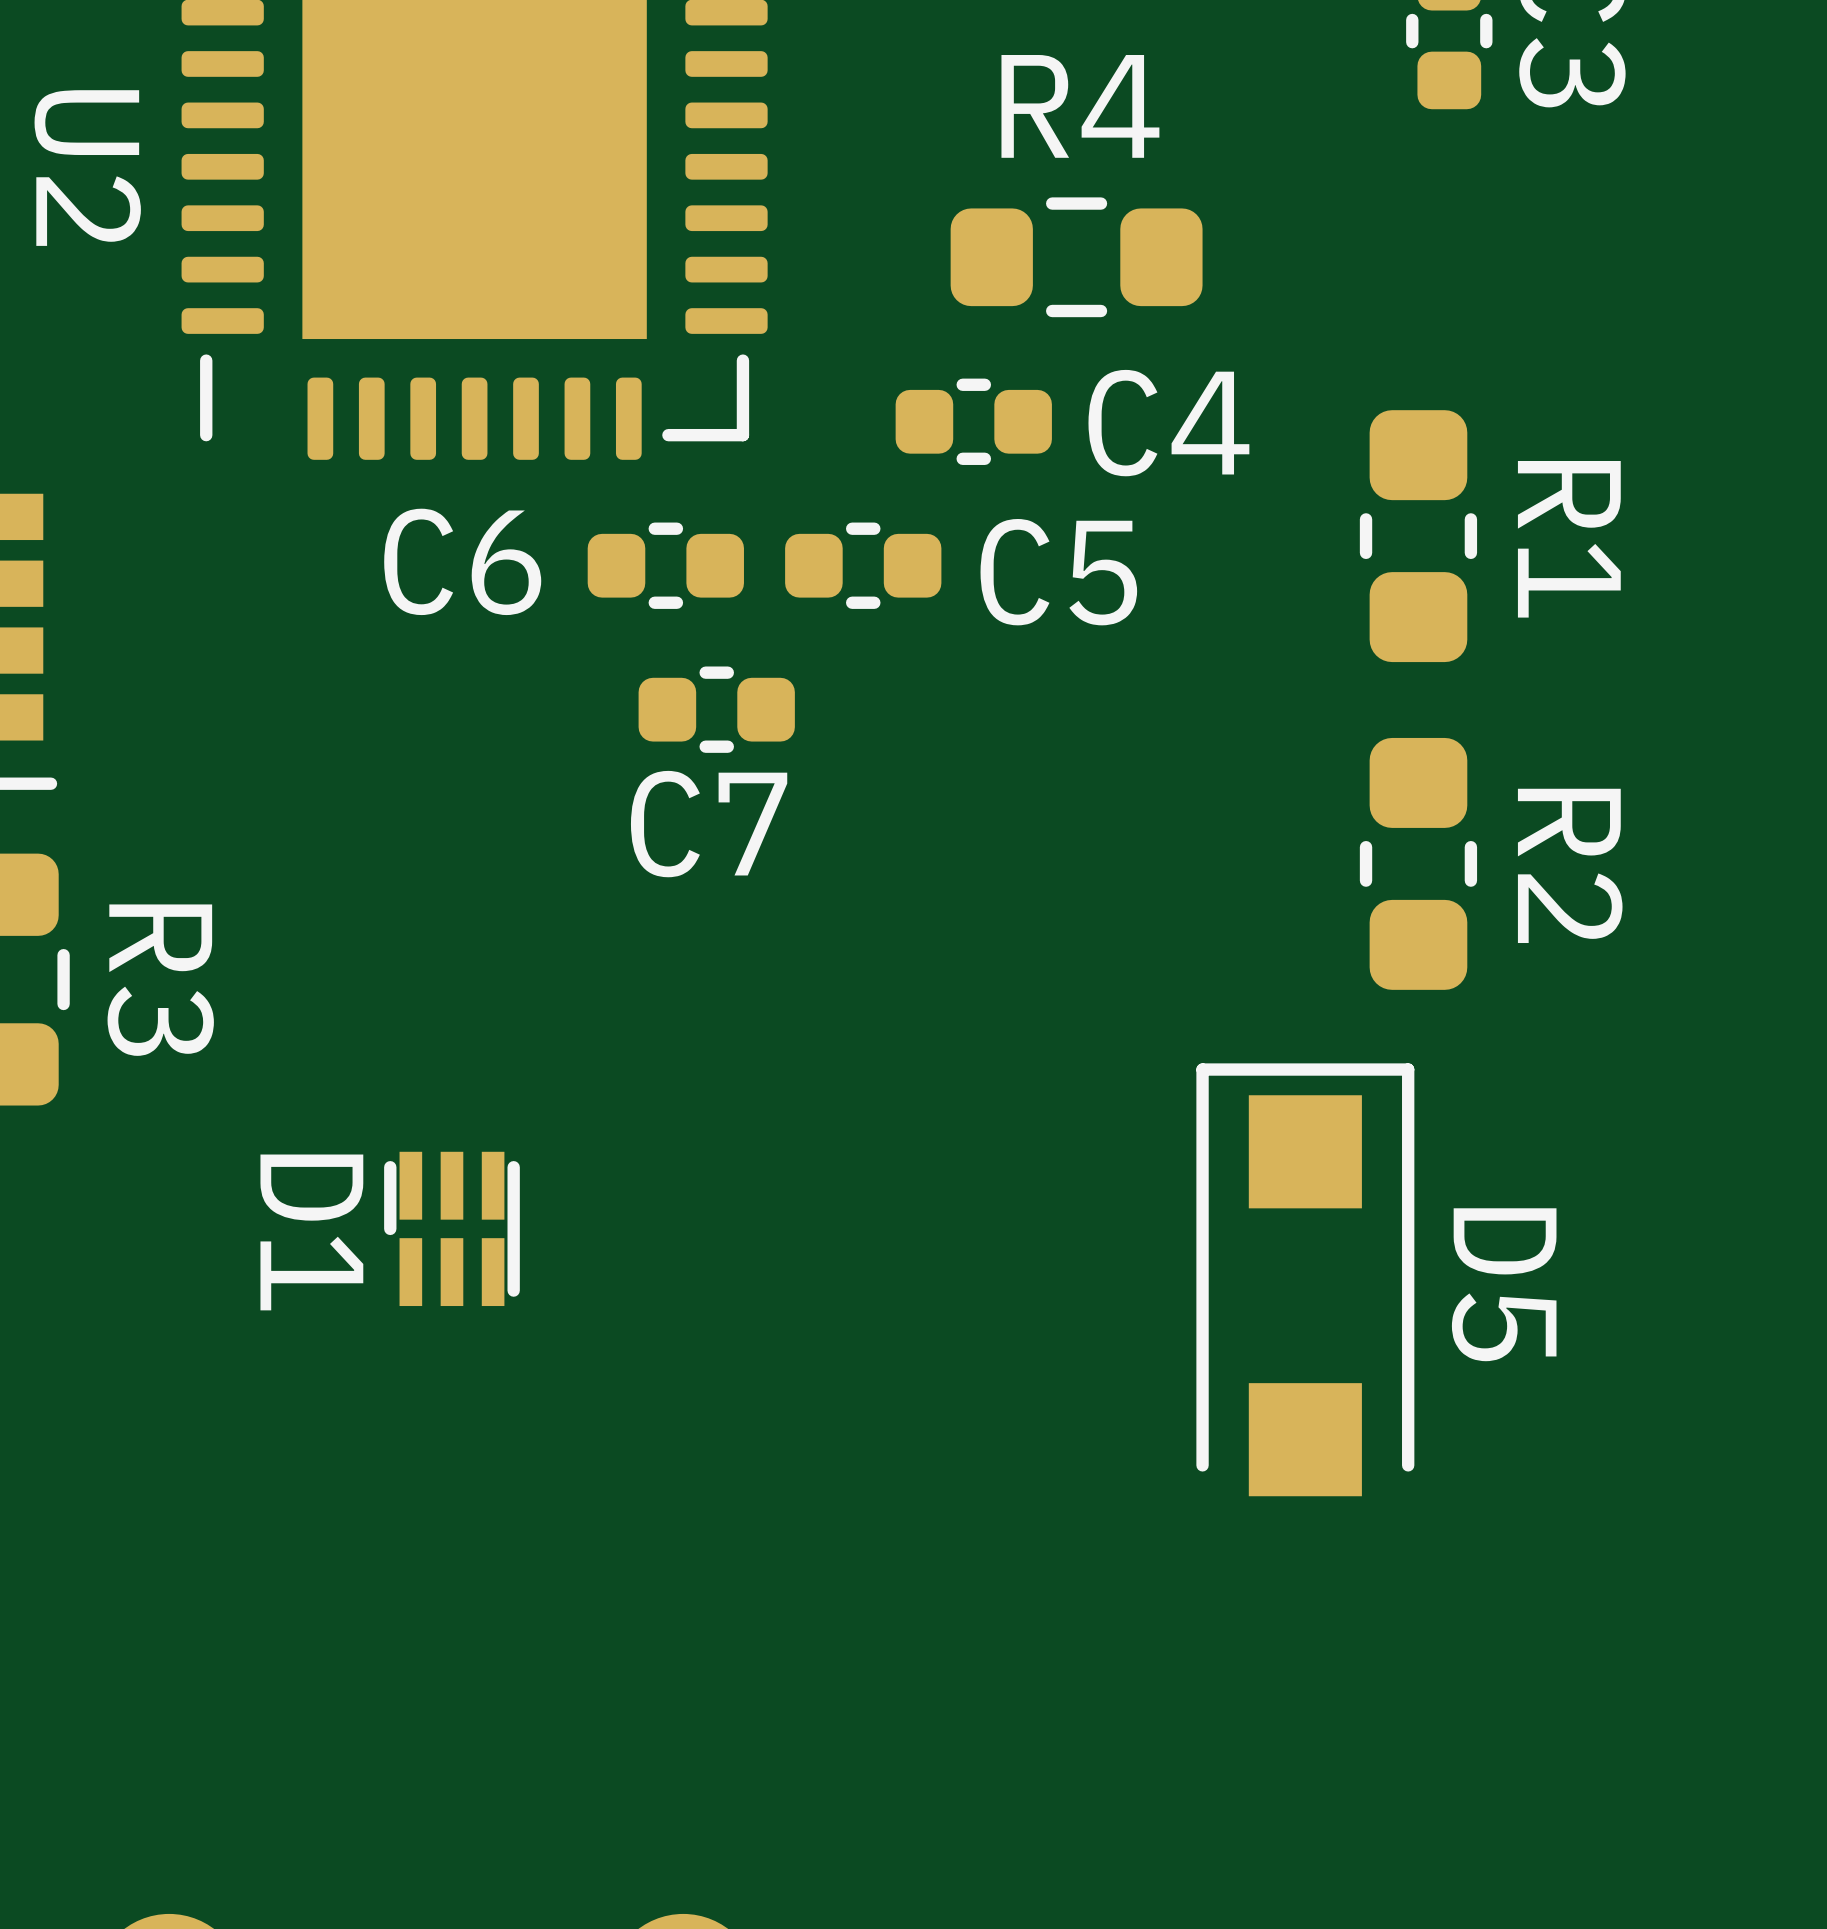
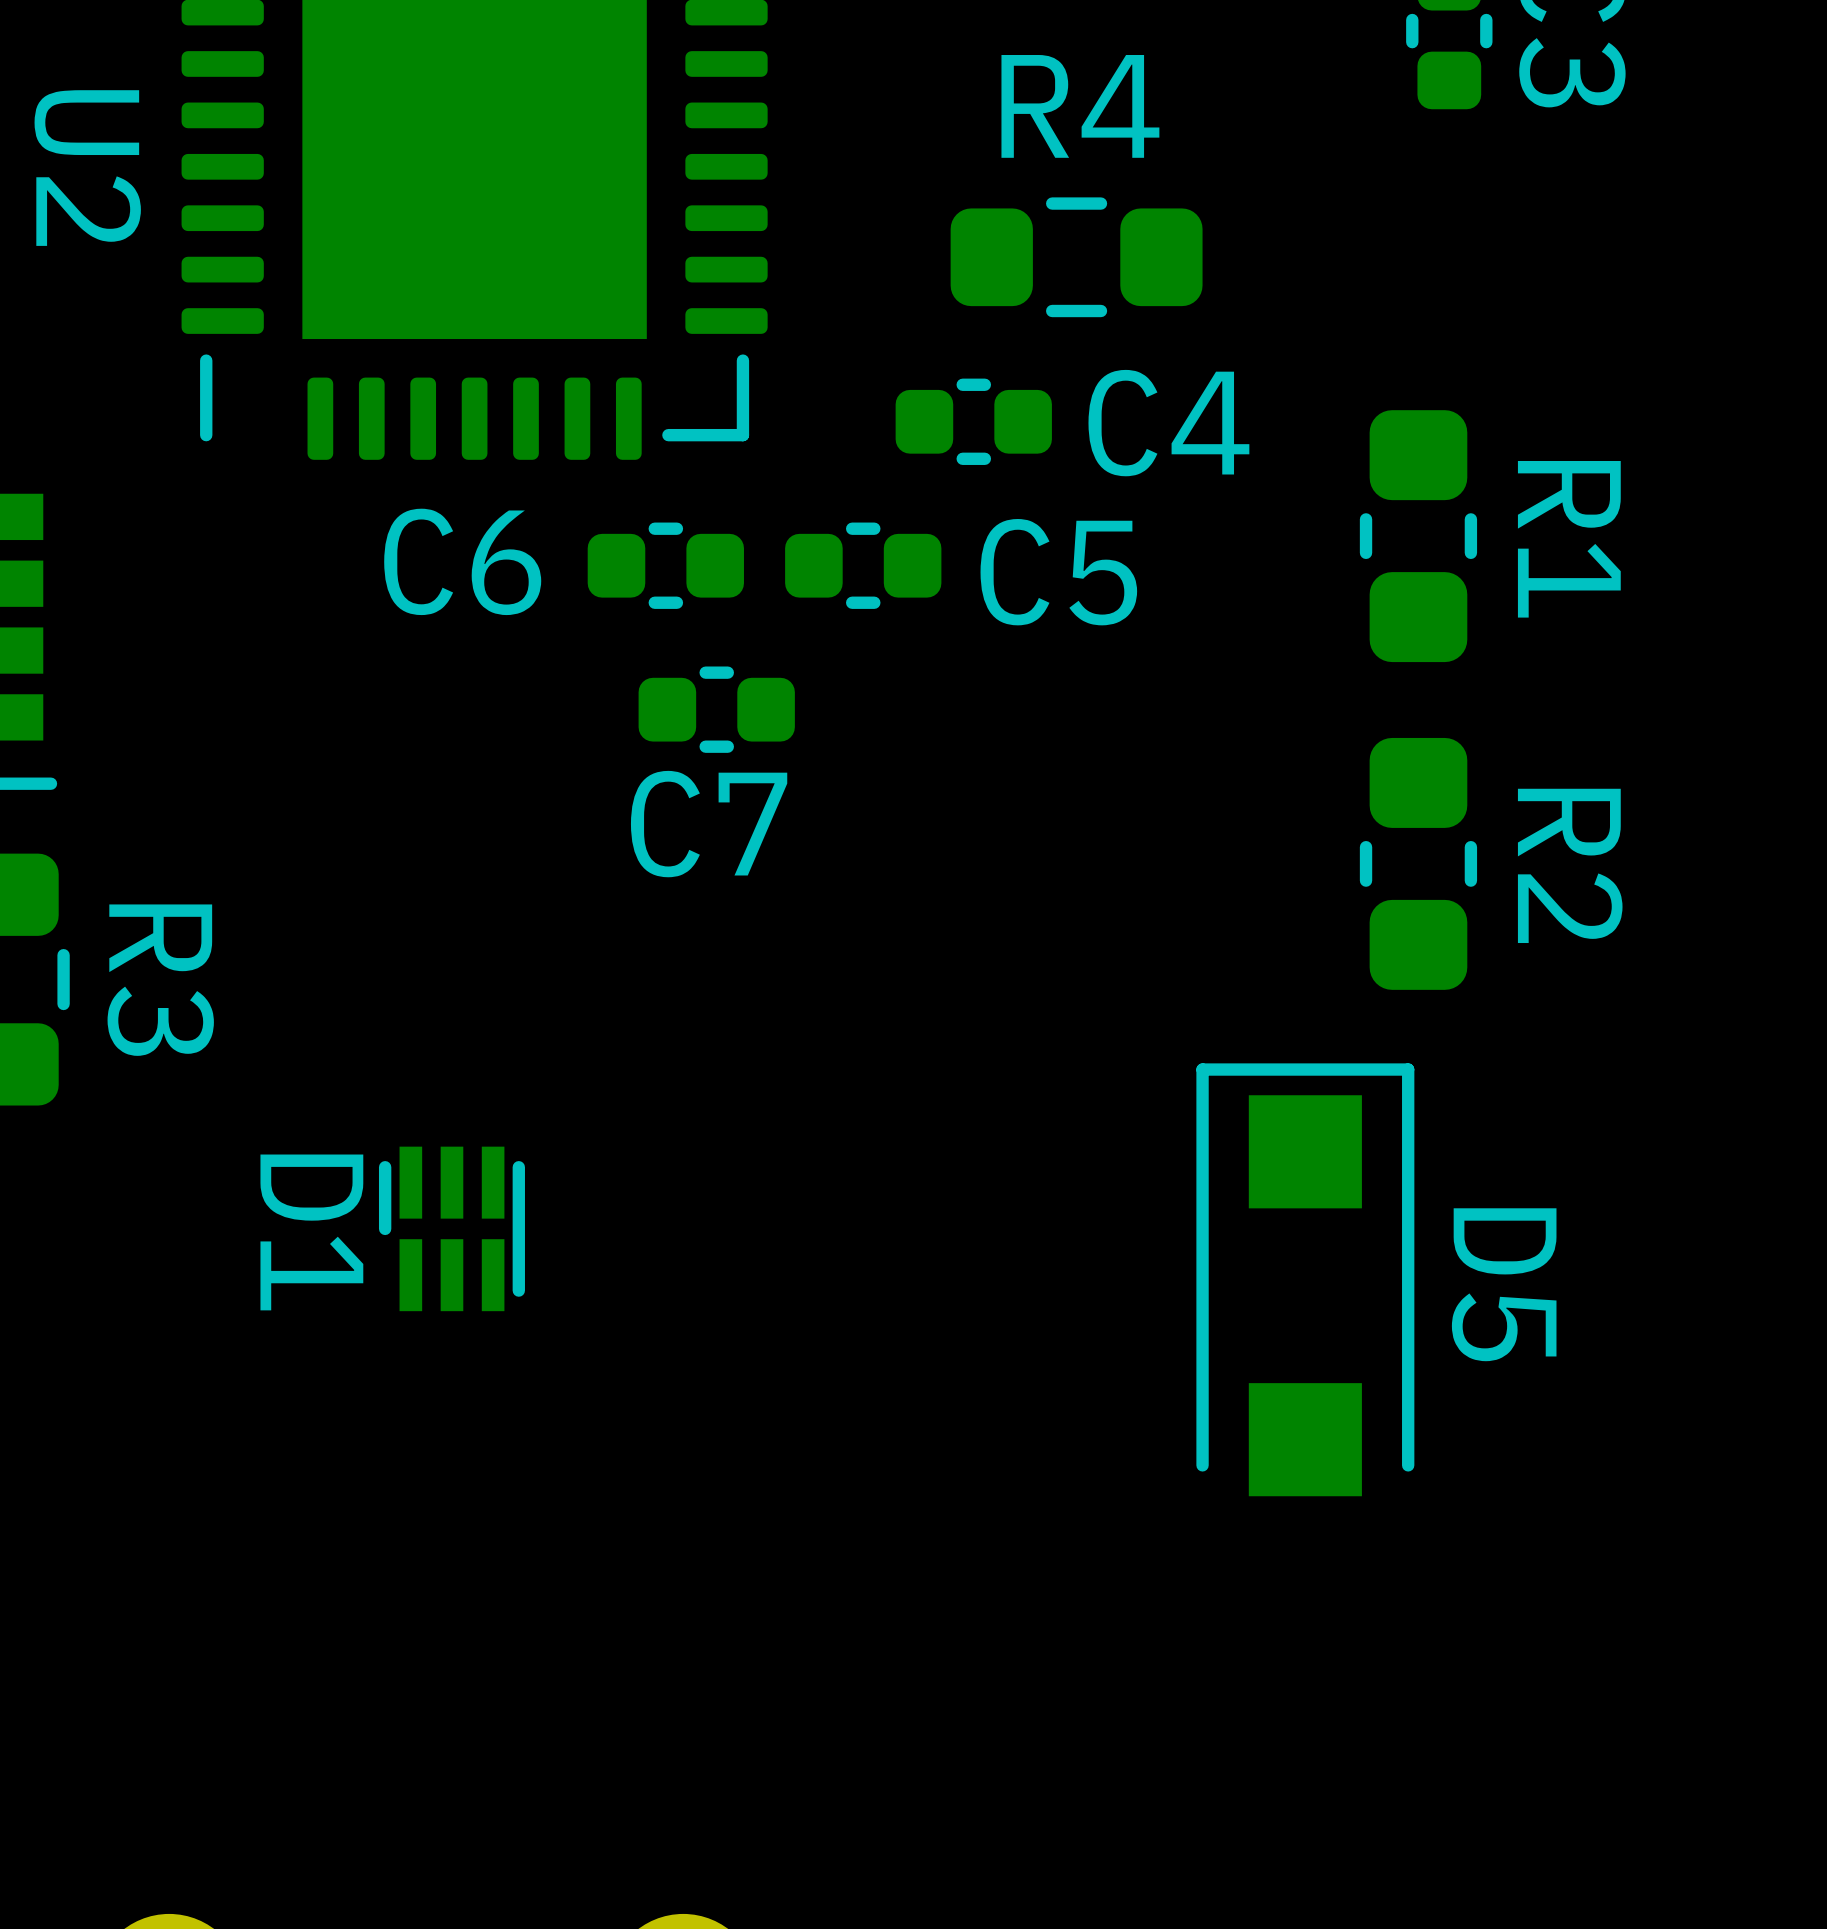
D1 footprint: [384, 1151, 520, 1307] -> [378, 1146, 525, 1312]

